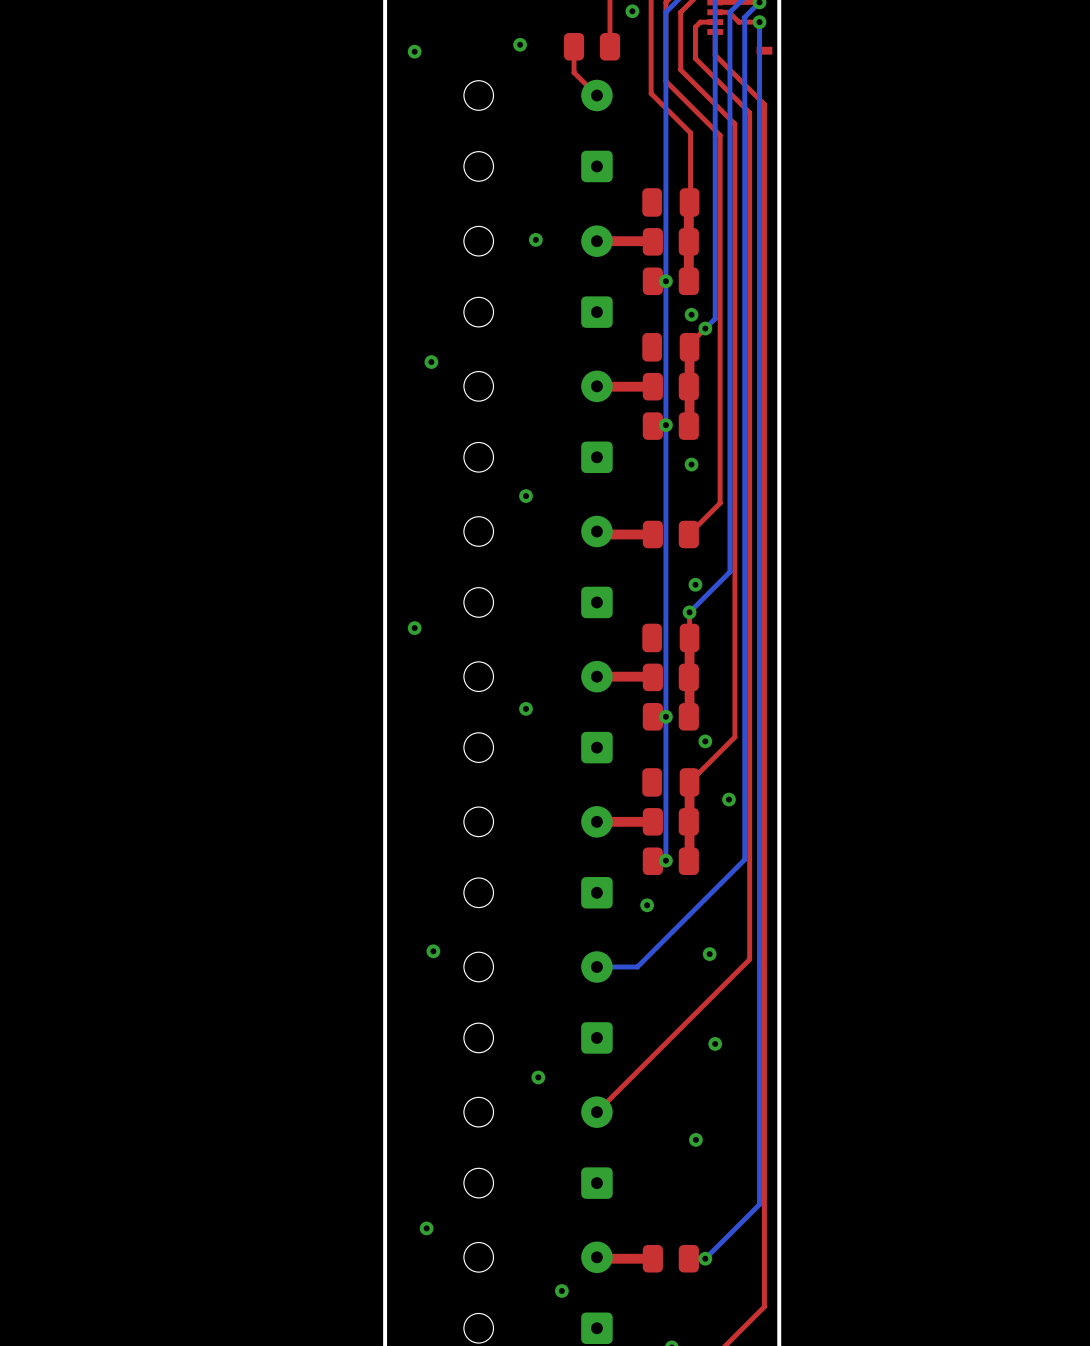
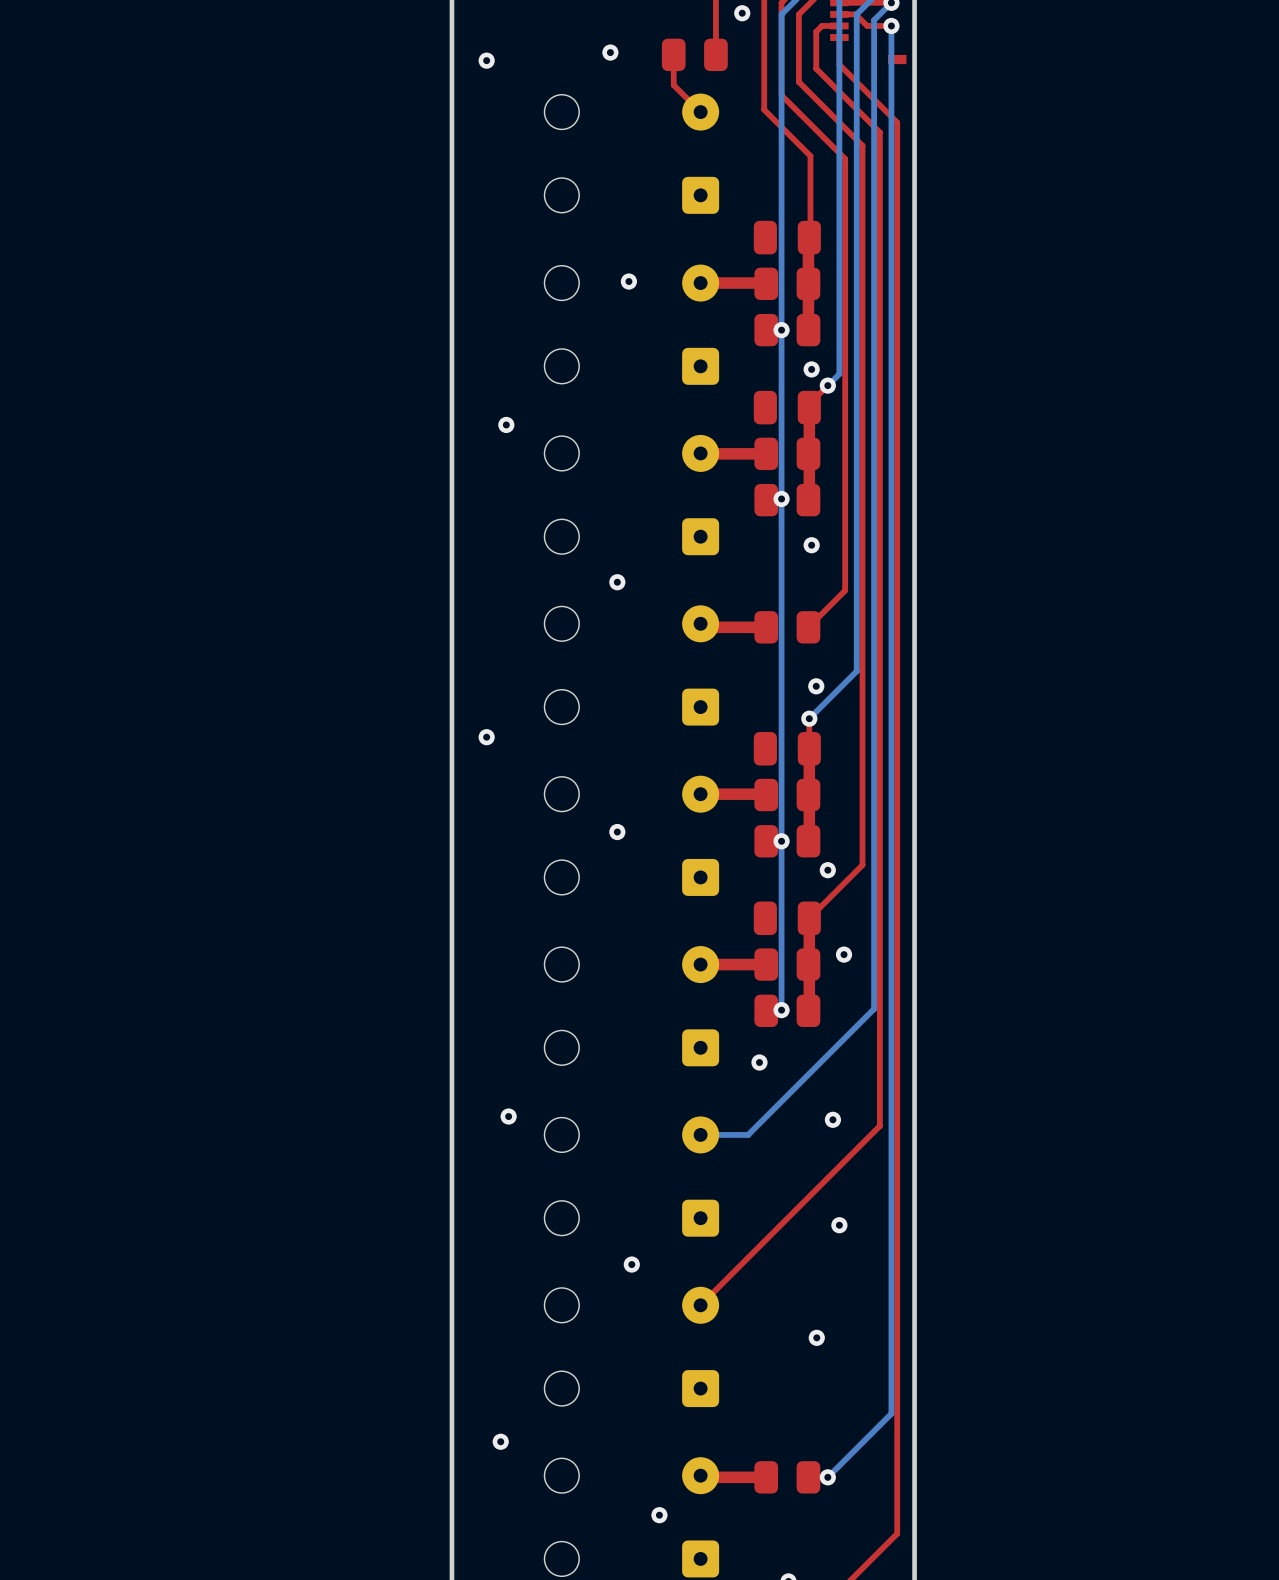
via position: (728, 799) -> (844, 954)

